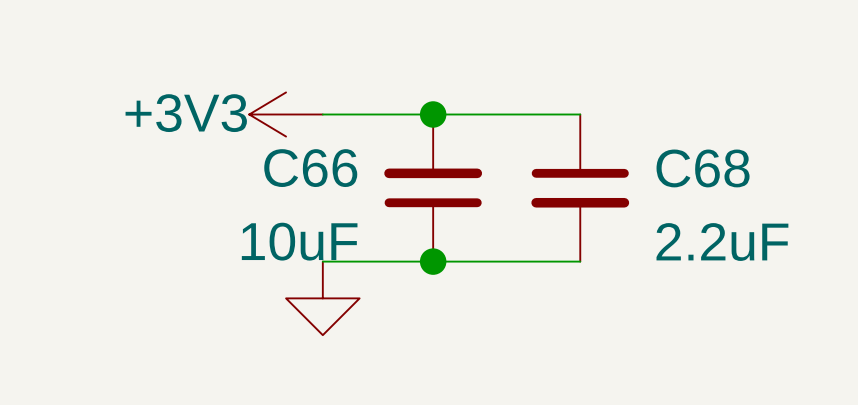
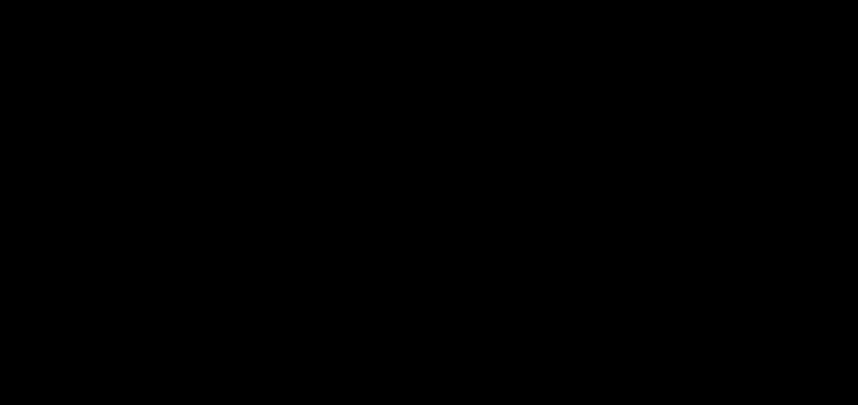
power symbol: +3V3 (286, 114) -> none
wire: (322, 114) (580, 114) -> none
junction: (433, 114) -> none
C66: (433, 188) -> none
C68: (580, 188) -> none
wire: (322, 261) (580, 261) -> none
junction: (433, 261) -> none
power symbol: (322, 298) -> none

